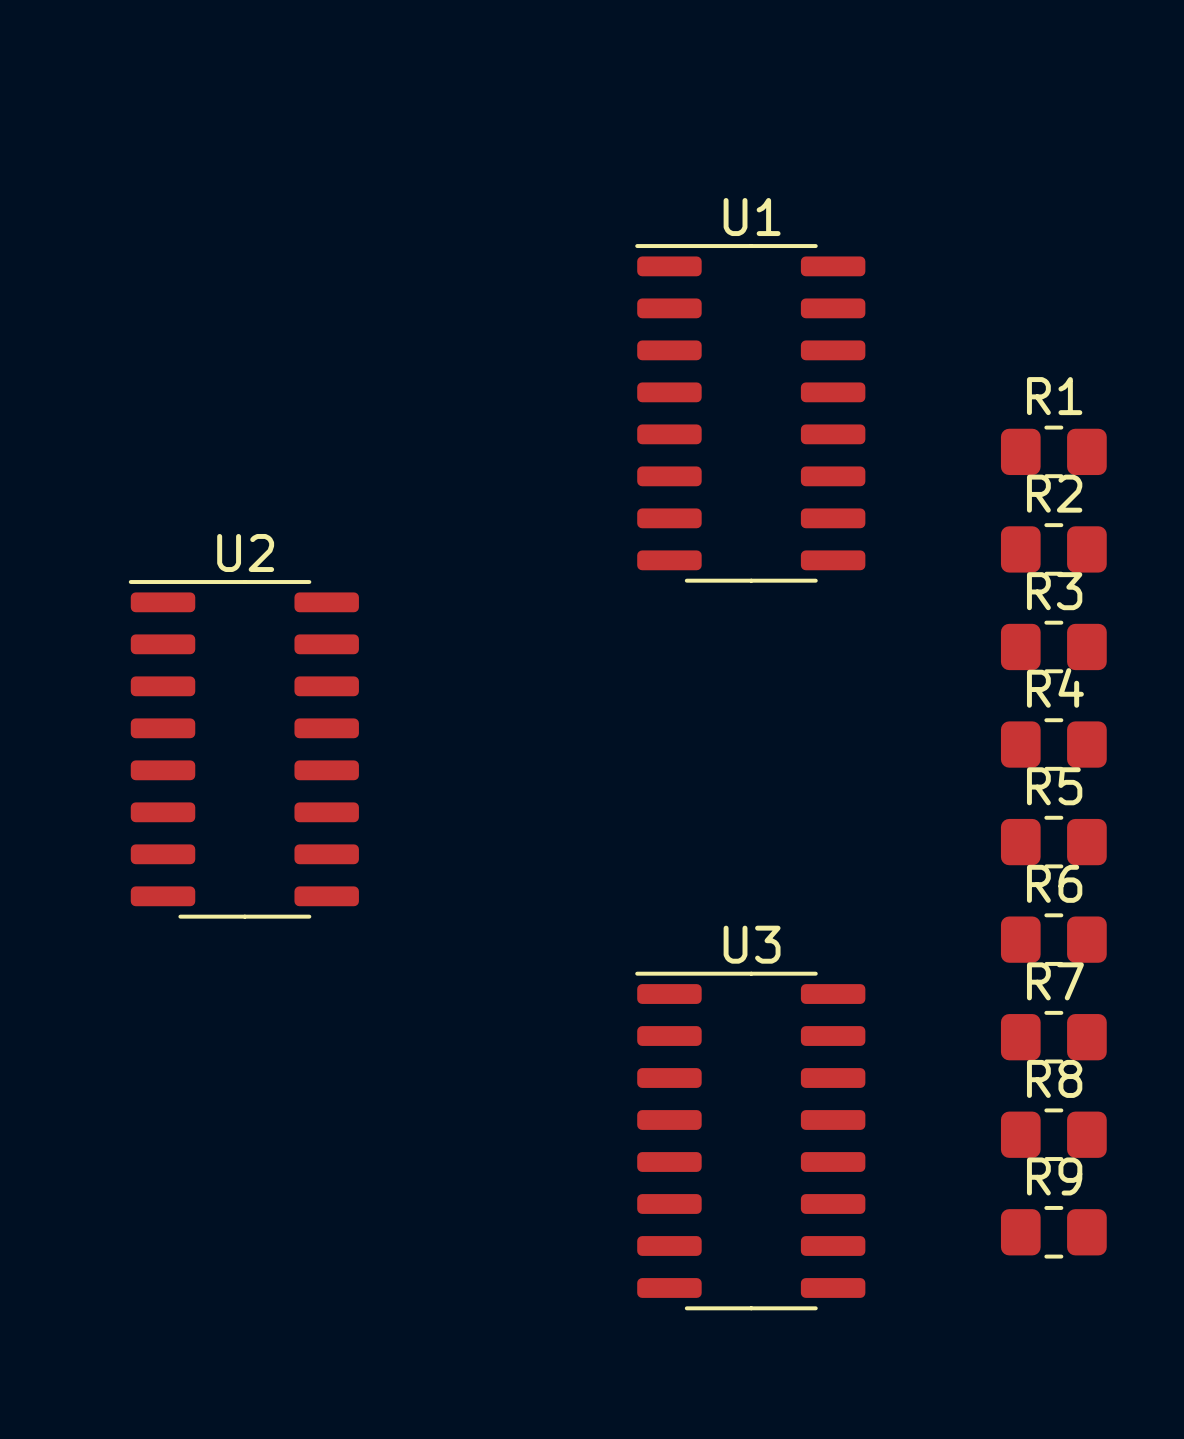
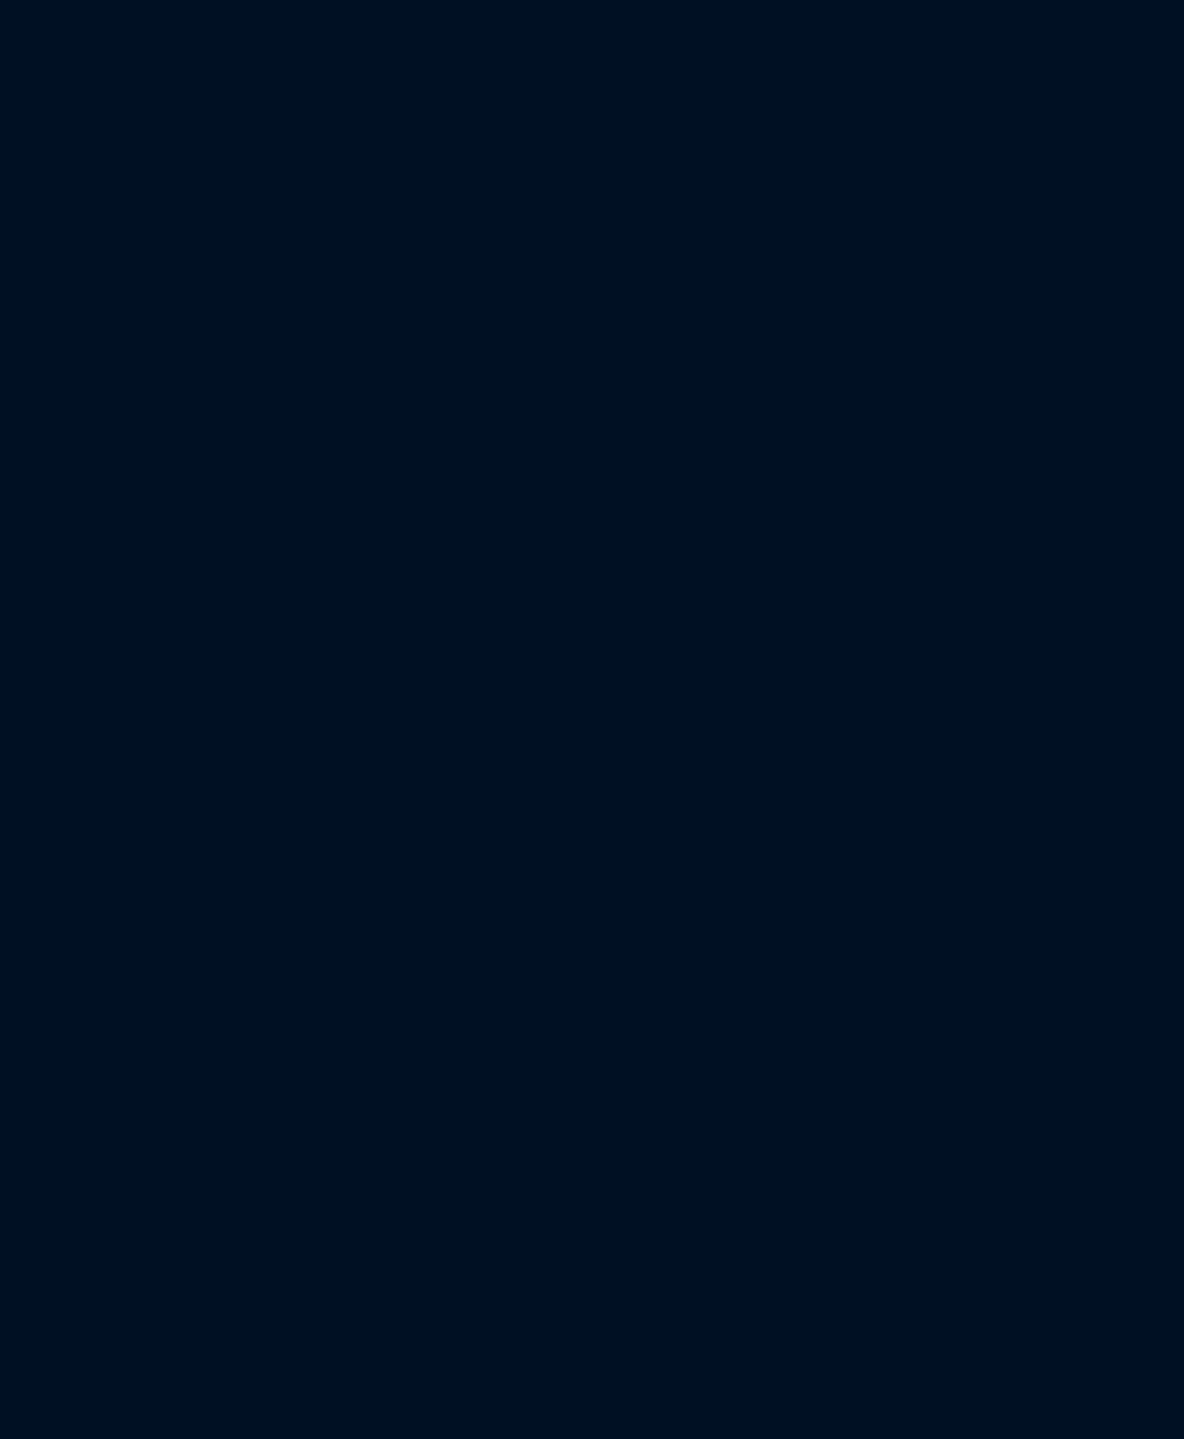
U1: (750, 413) -> none
R1: (1053, 451) -> none
R2: (1053, 549) -> none
R3: (1053, 646) -> none
R4: (1053, 744) -> none
U2: (243, 749) -> none
R5: (1053, 842) -> none
R6: (1053, 939) -> none
R7: (1053, 1037) -> none
R8: (1053, 1134) -> none
U3: (750, 1141) -> none
R9: (1053, 1232) -> none

